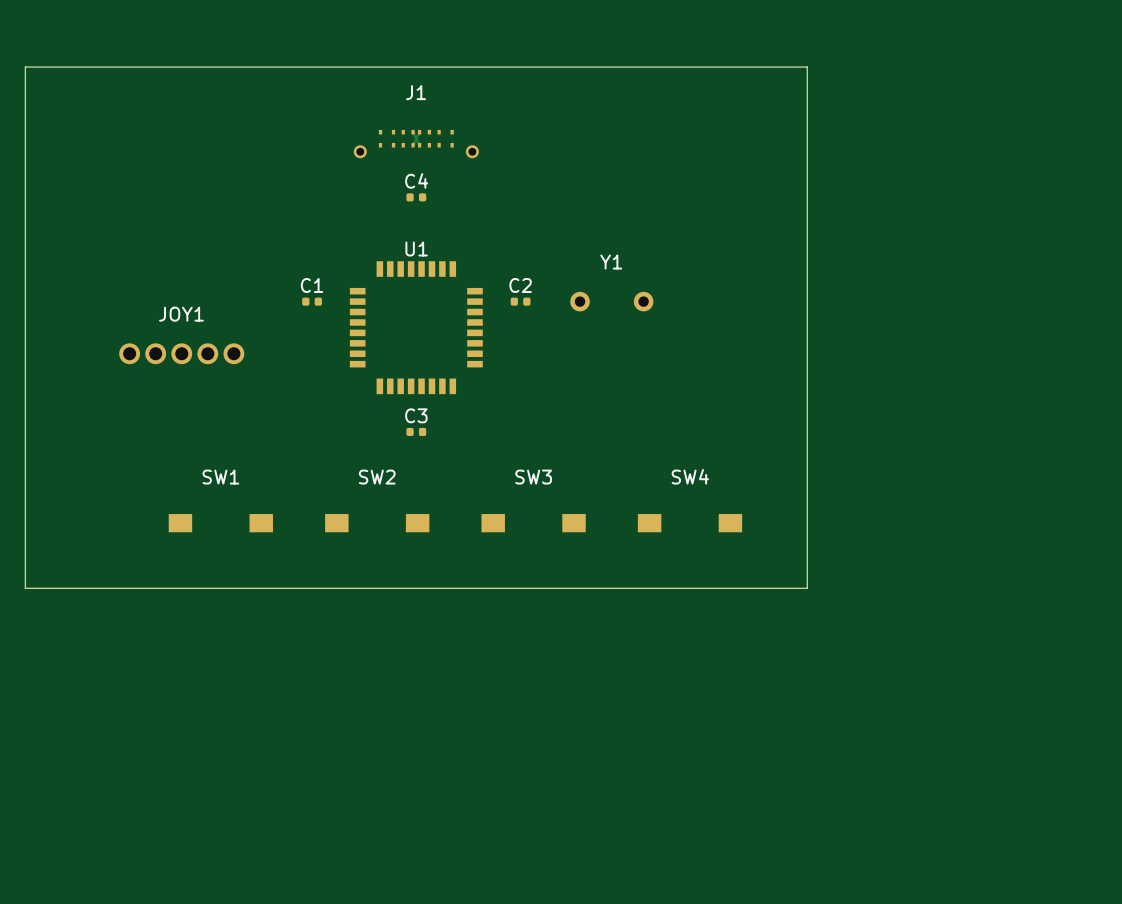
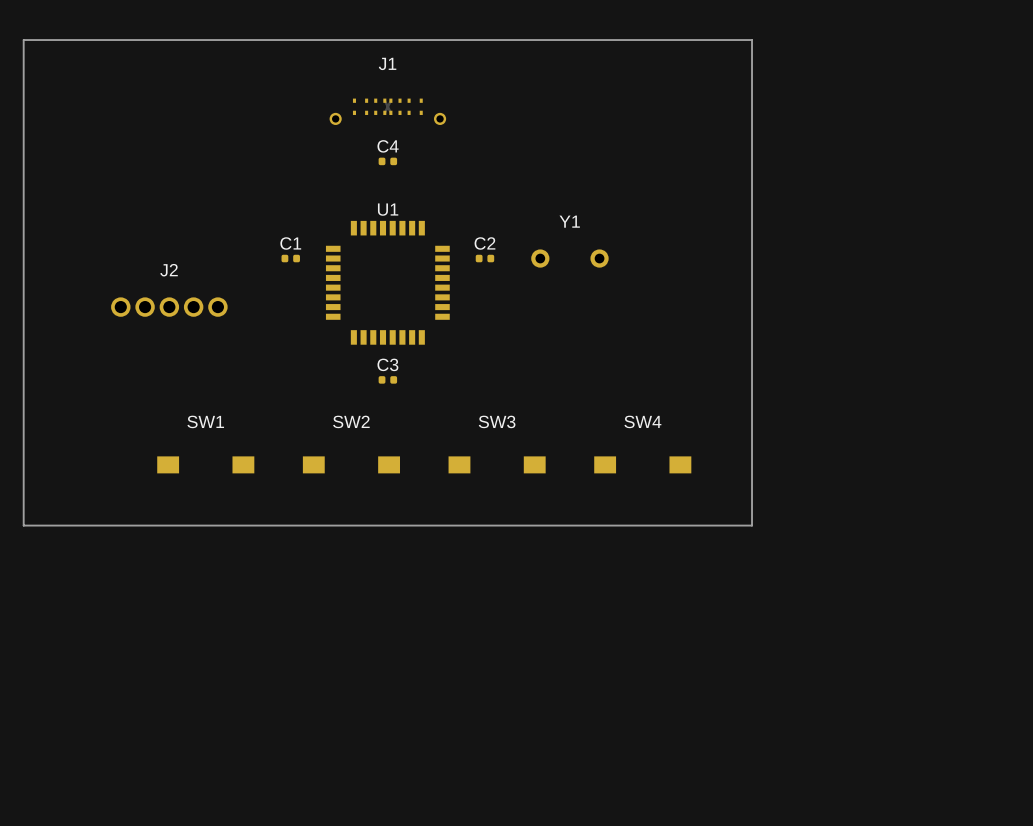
JOY1 name: JOY1 (181, 314) -> J2 (169, 270)

